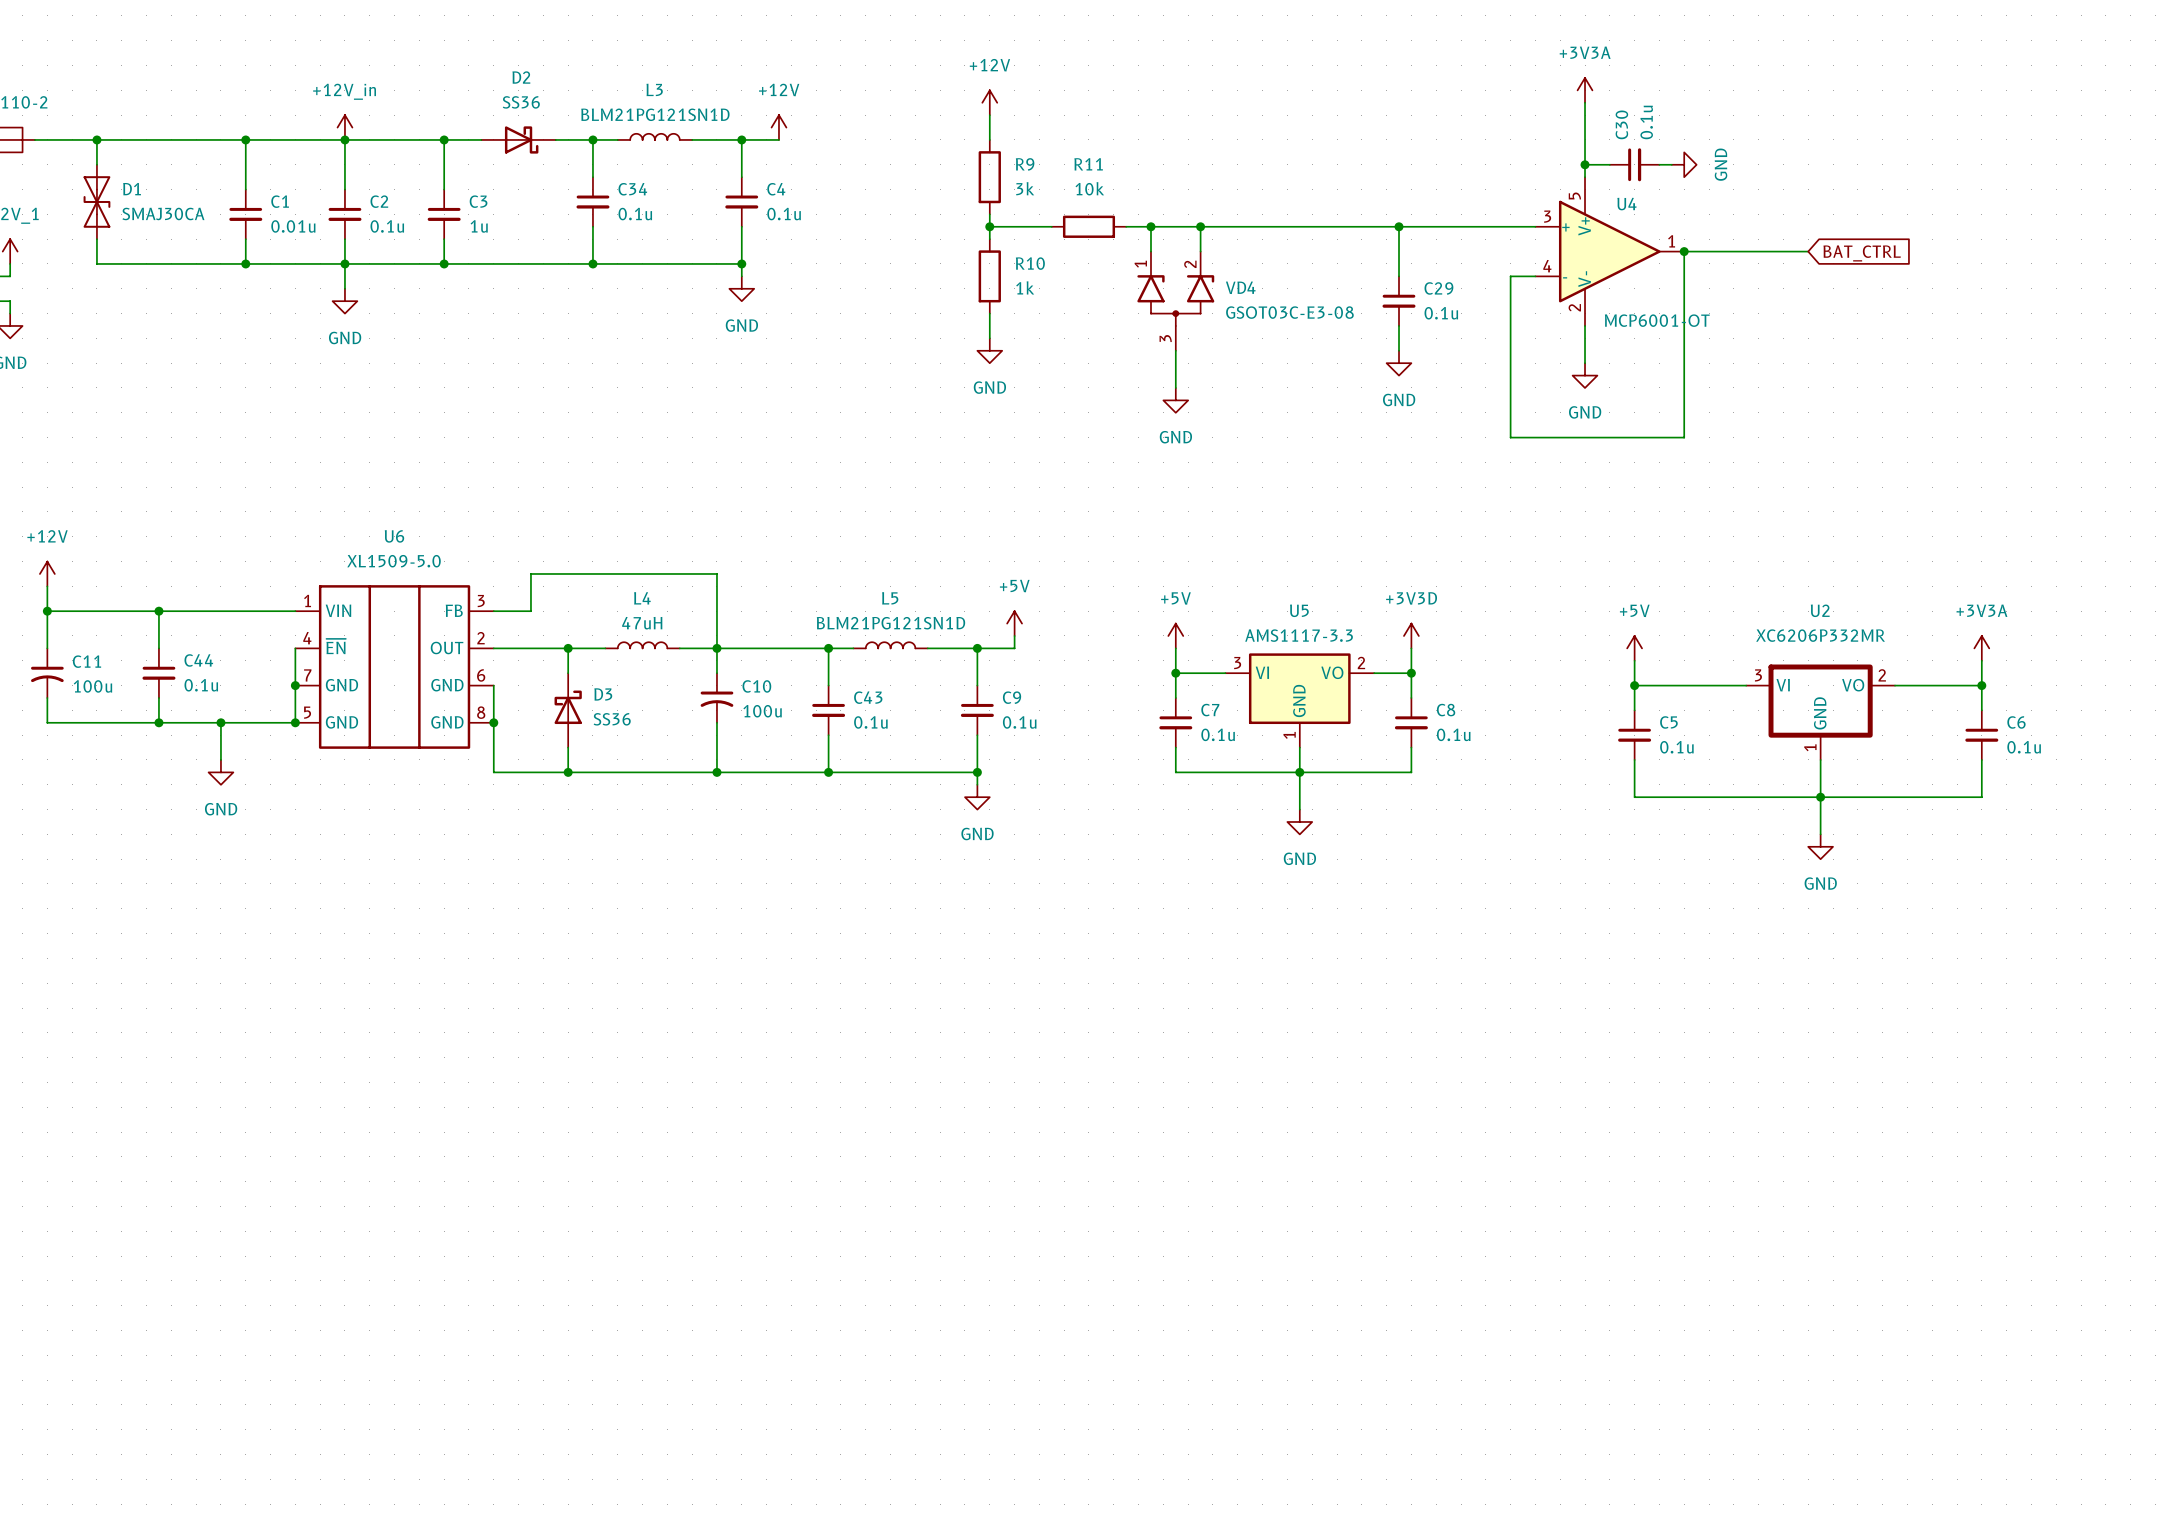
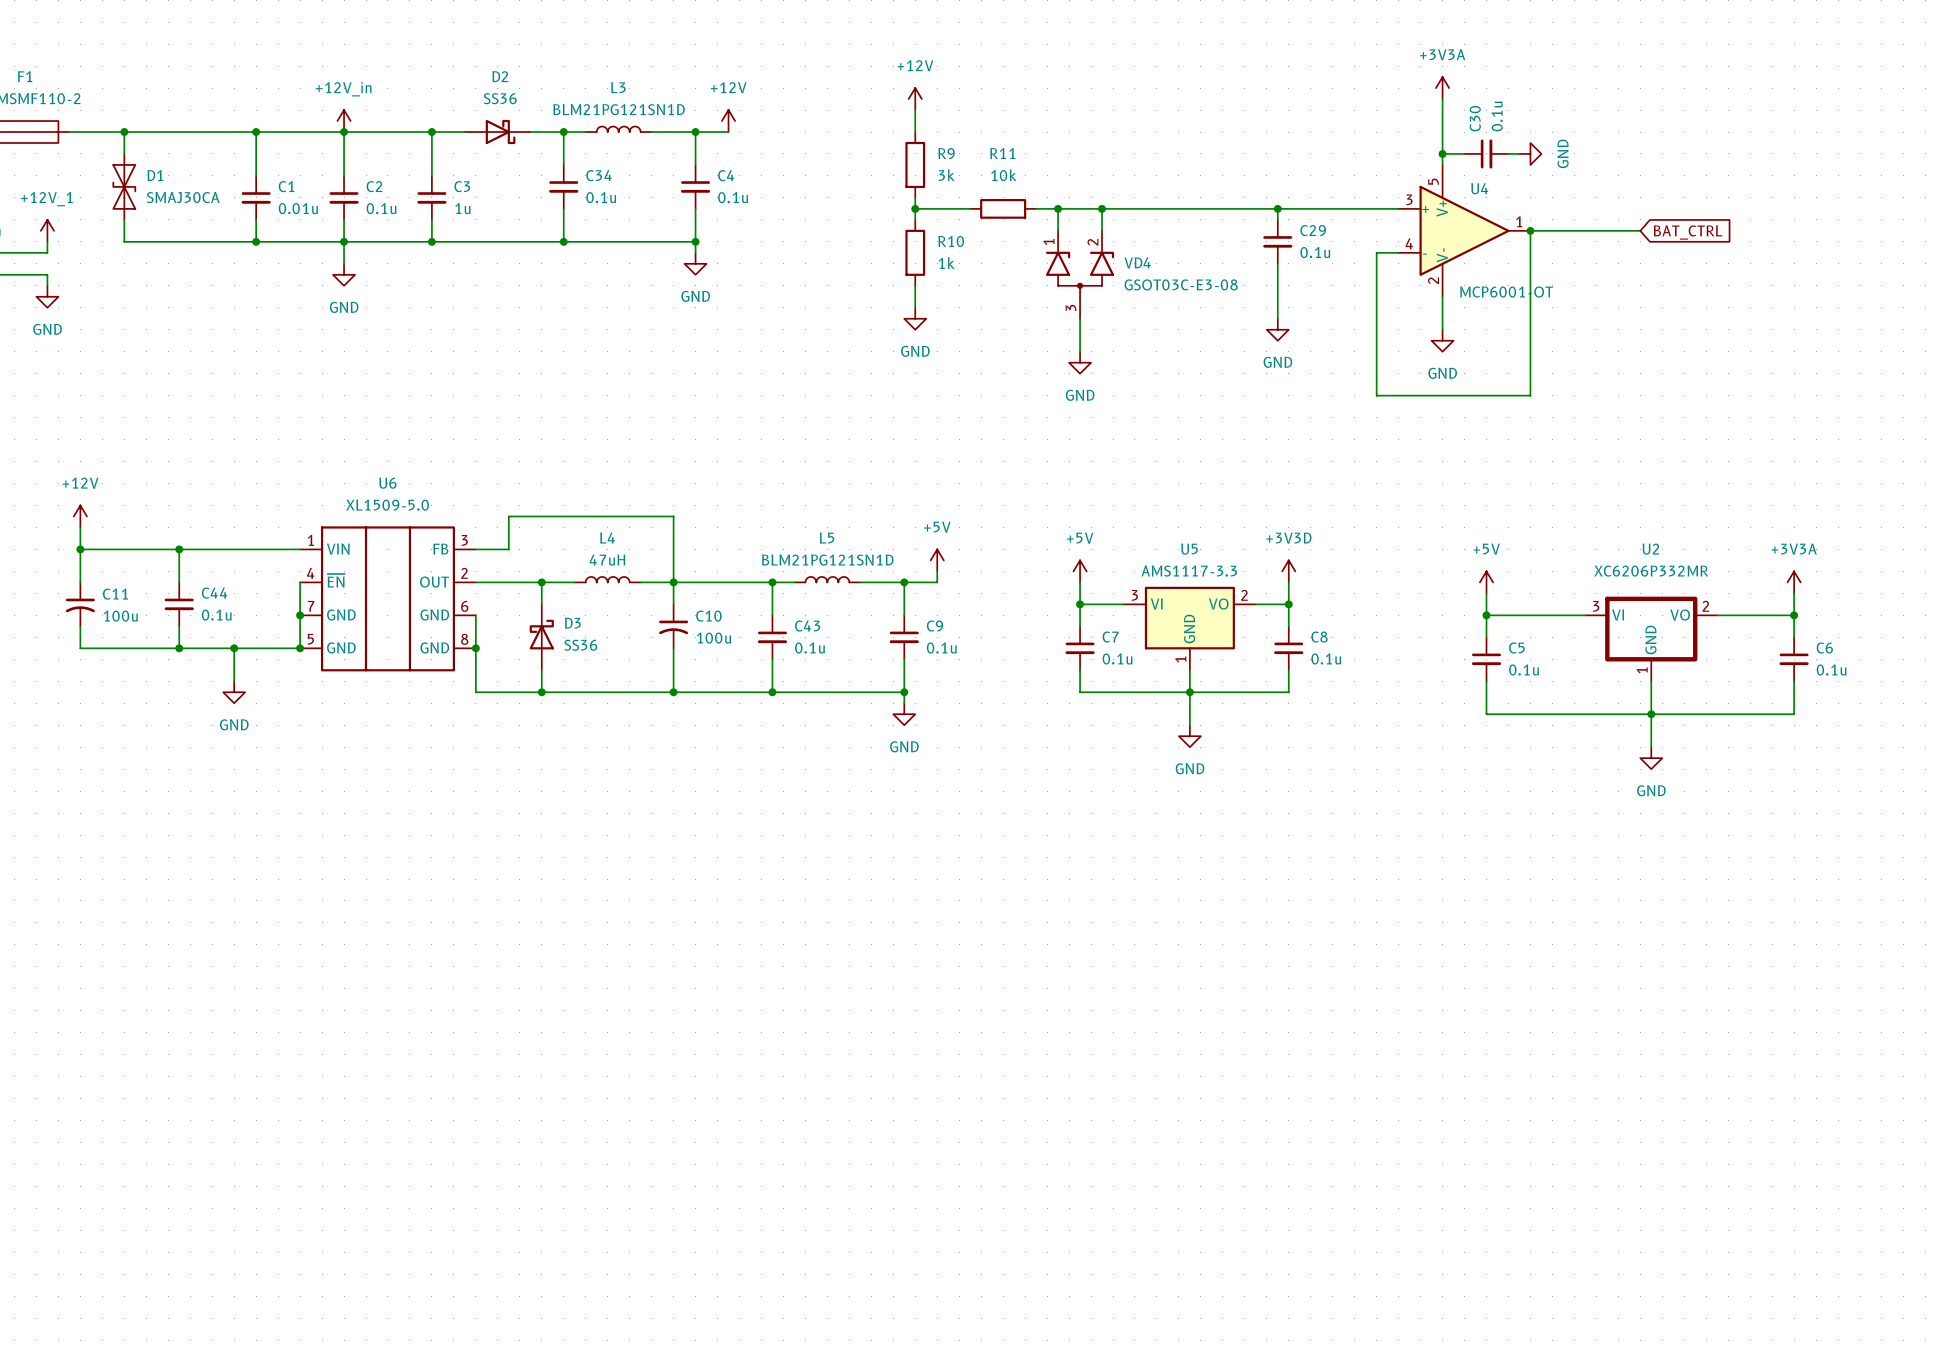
C29 position: (1399, 301) -> (1277, 241)

